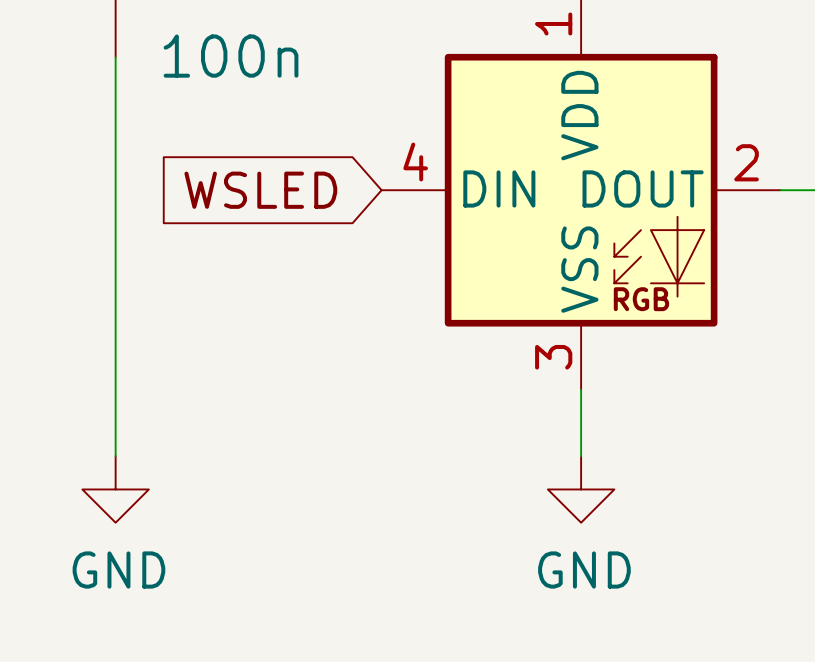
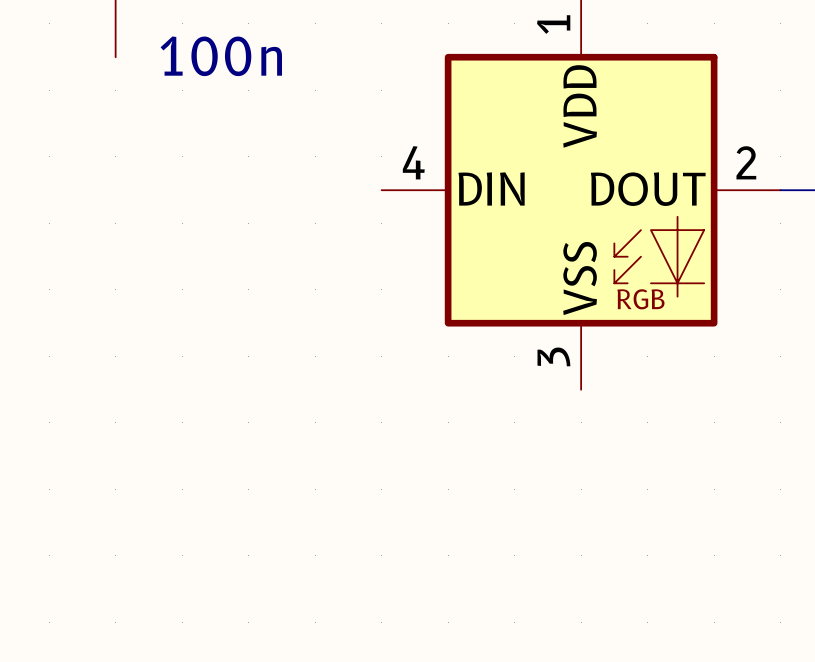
wire: (115, 57) (115, 456) -> none
global label: WSLED (260, 190) -> none
wire: (581, 389) (581, 456) -> none
power symbol: GND (115, 489) -> none
power symbol: GND (581, 489) -> none

